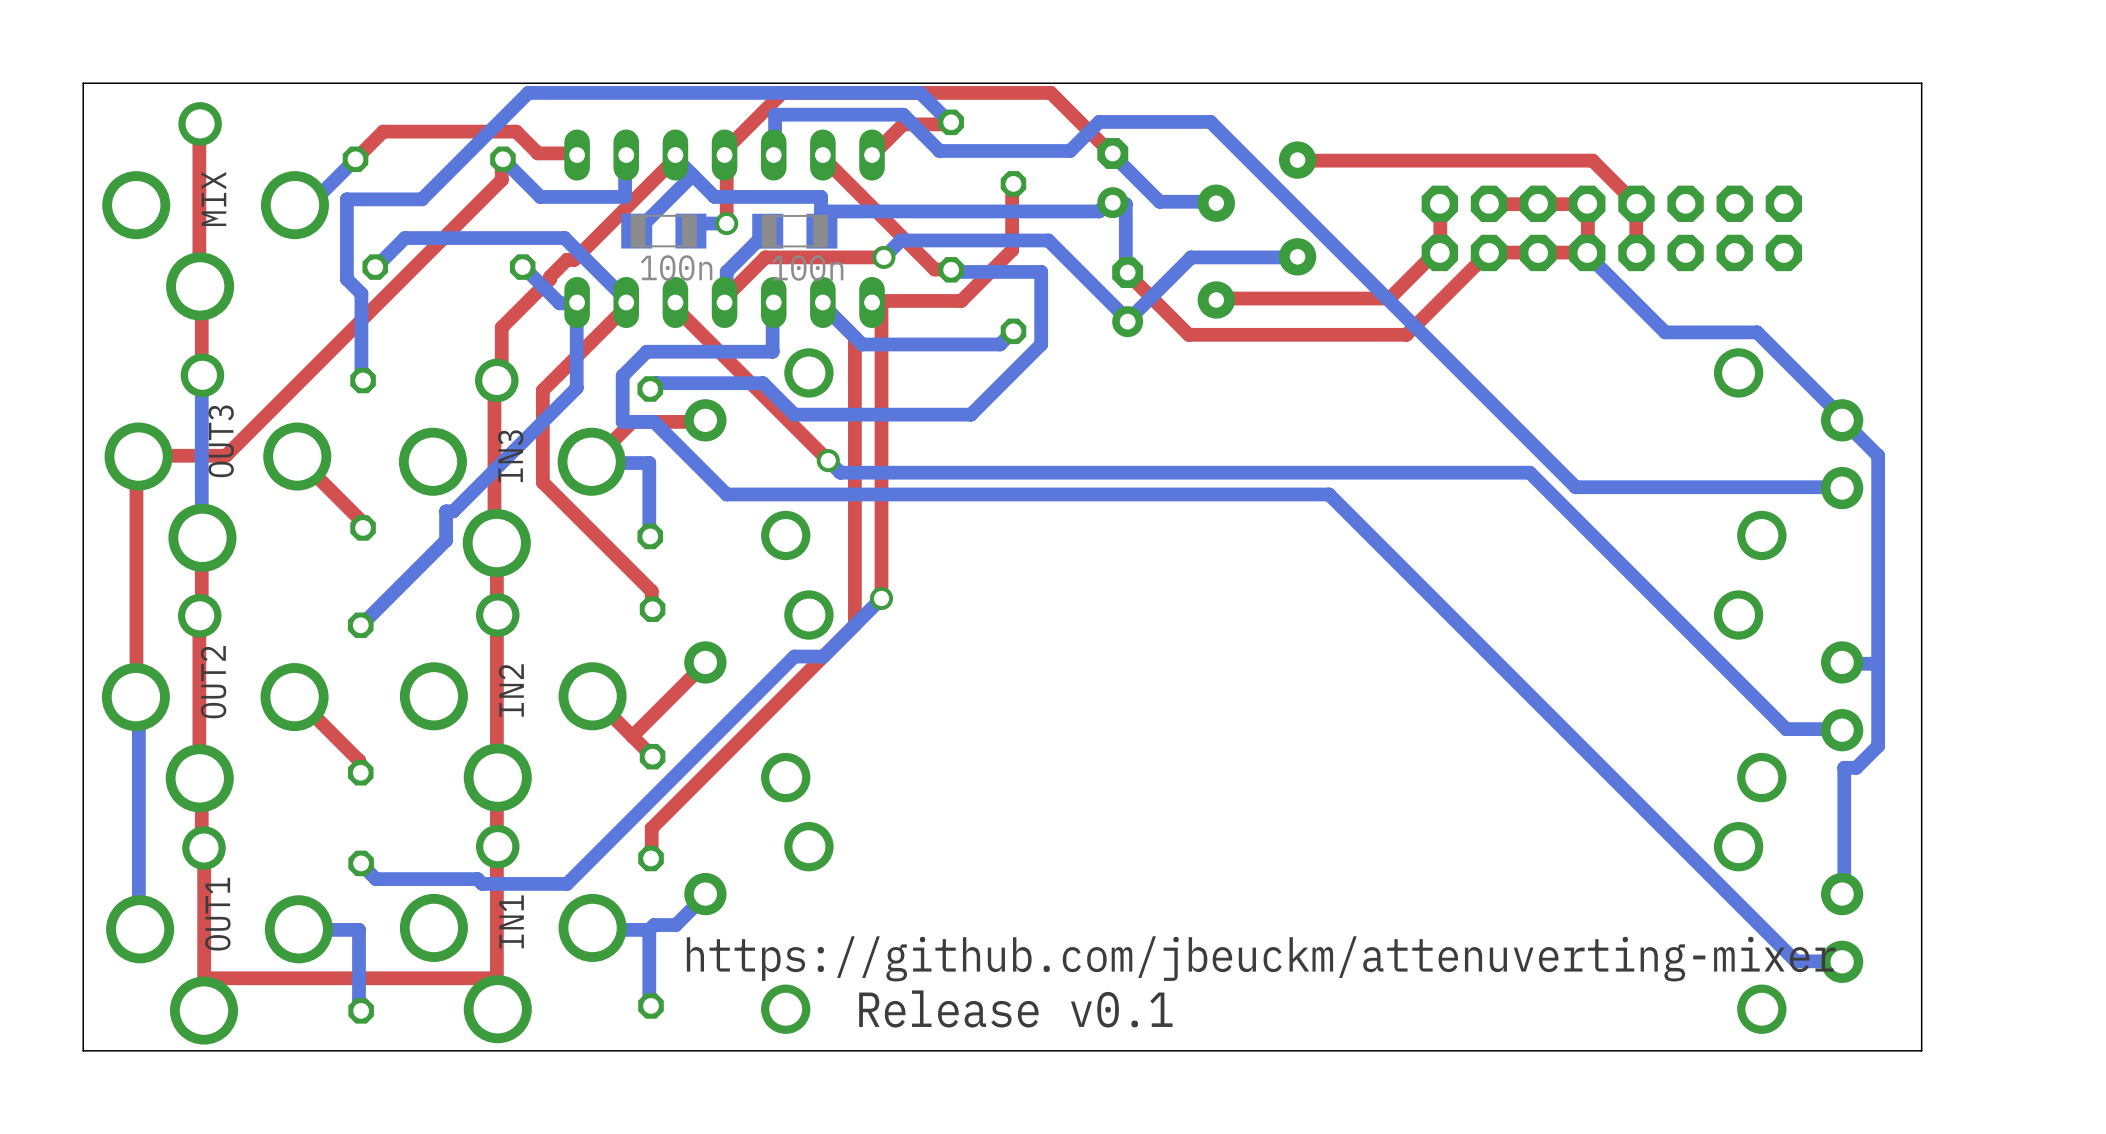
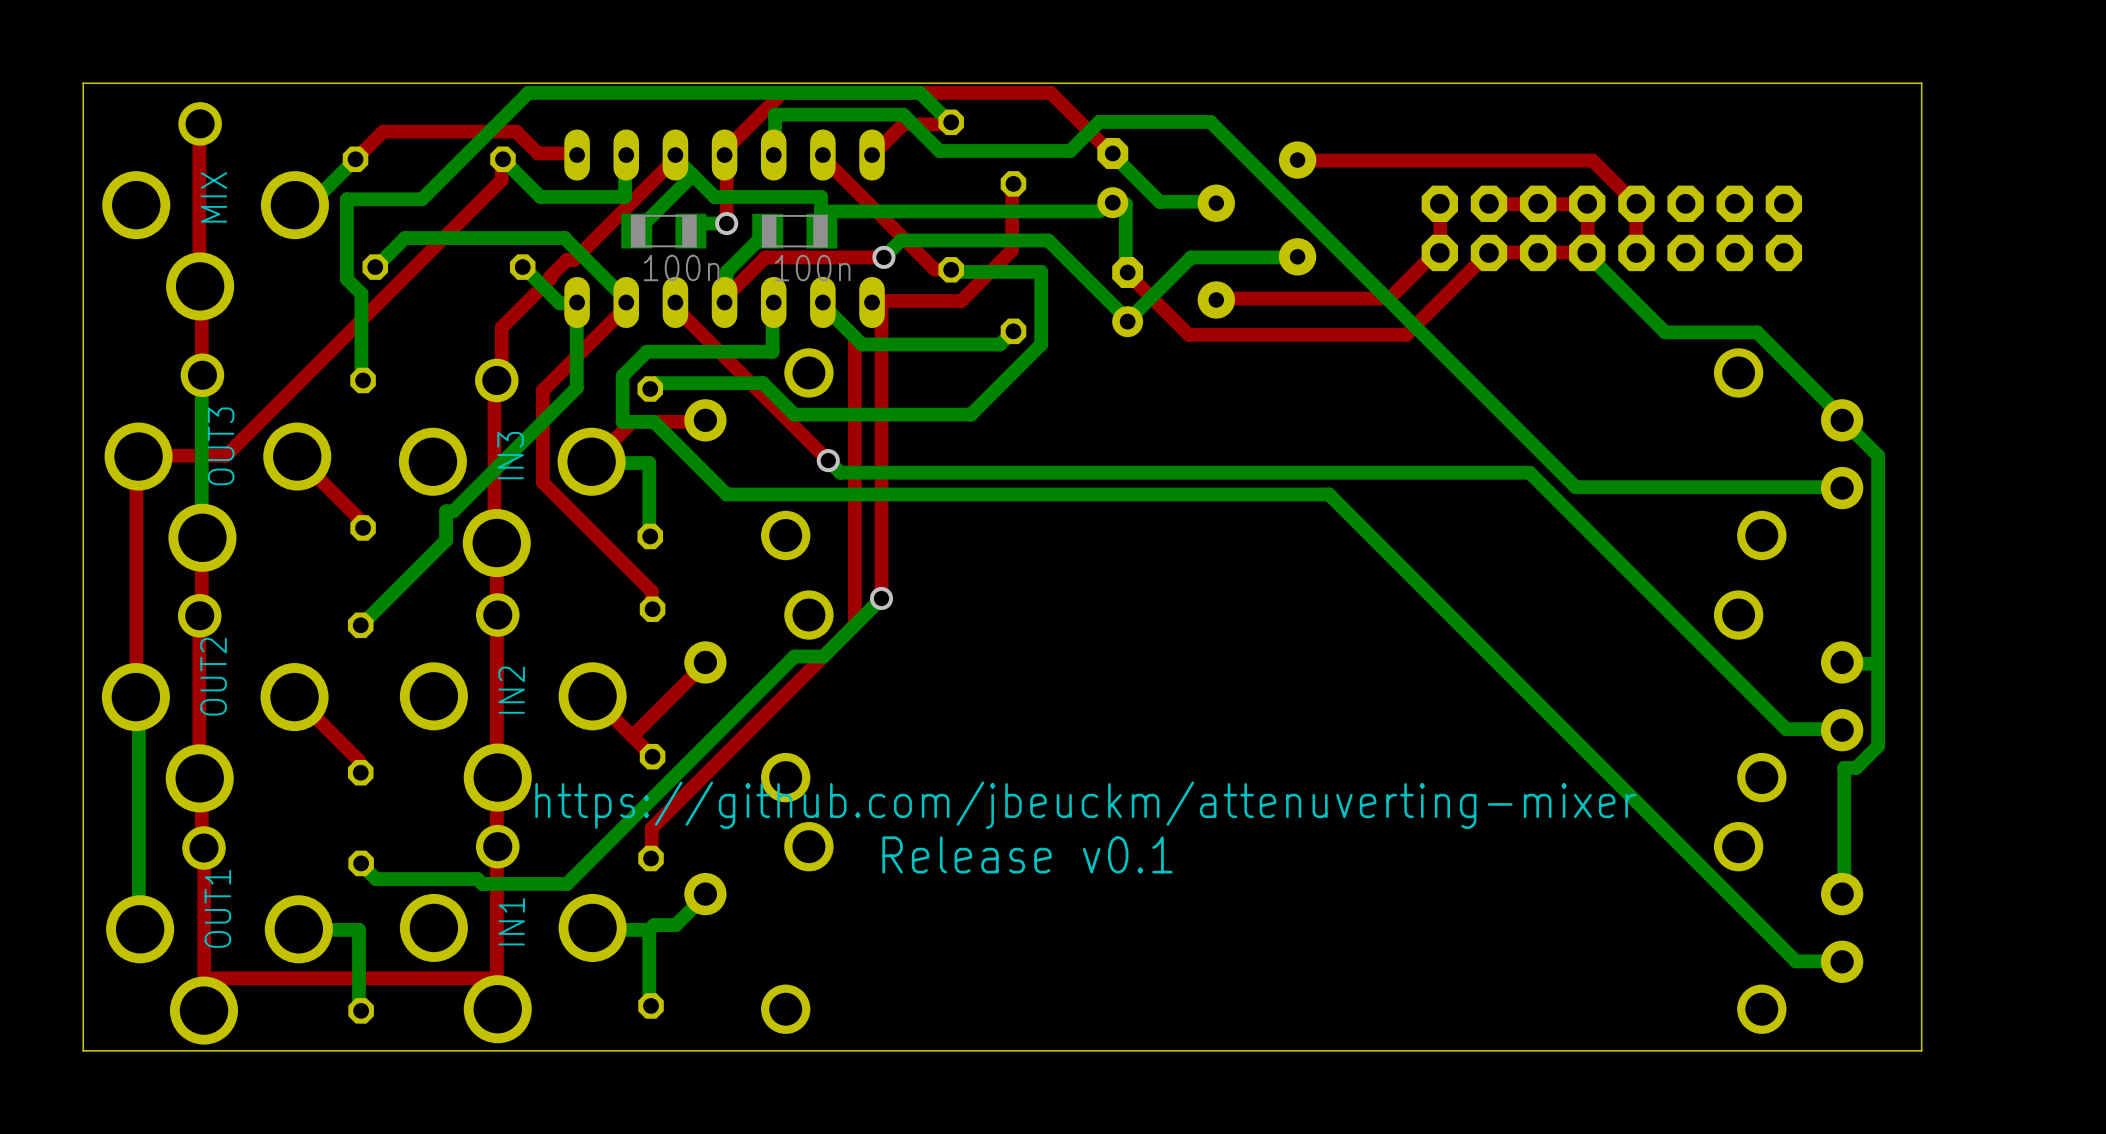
text position: https://github.com/jbeuckm/attenuverting-mixer (1261, 958) -> https://github.com/jbeuckm/attenuverting-mixer (1085, 805)
text position: Release v0.1 (1015, 1008) -> Release v0.1 (1027, 854)

